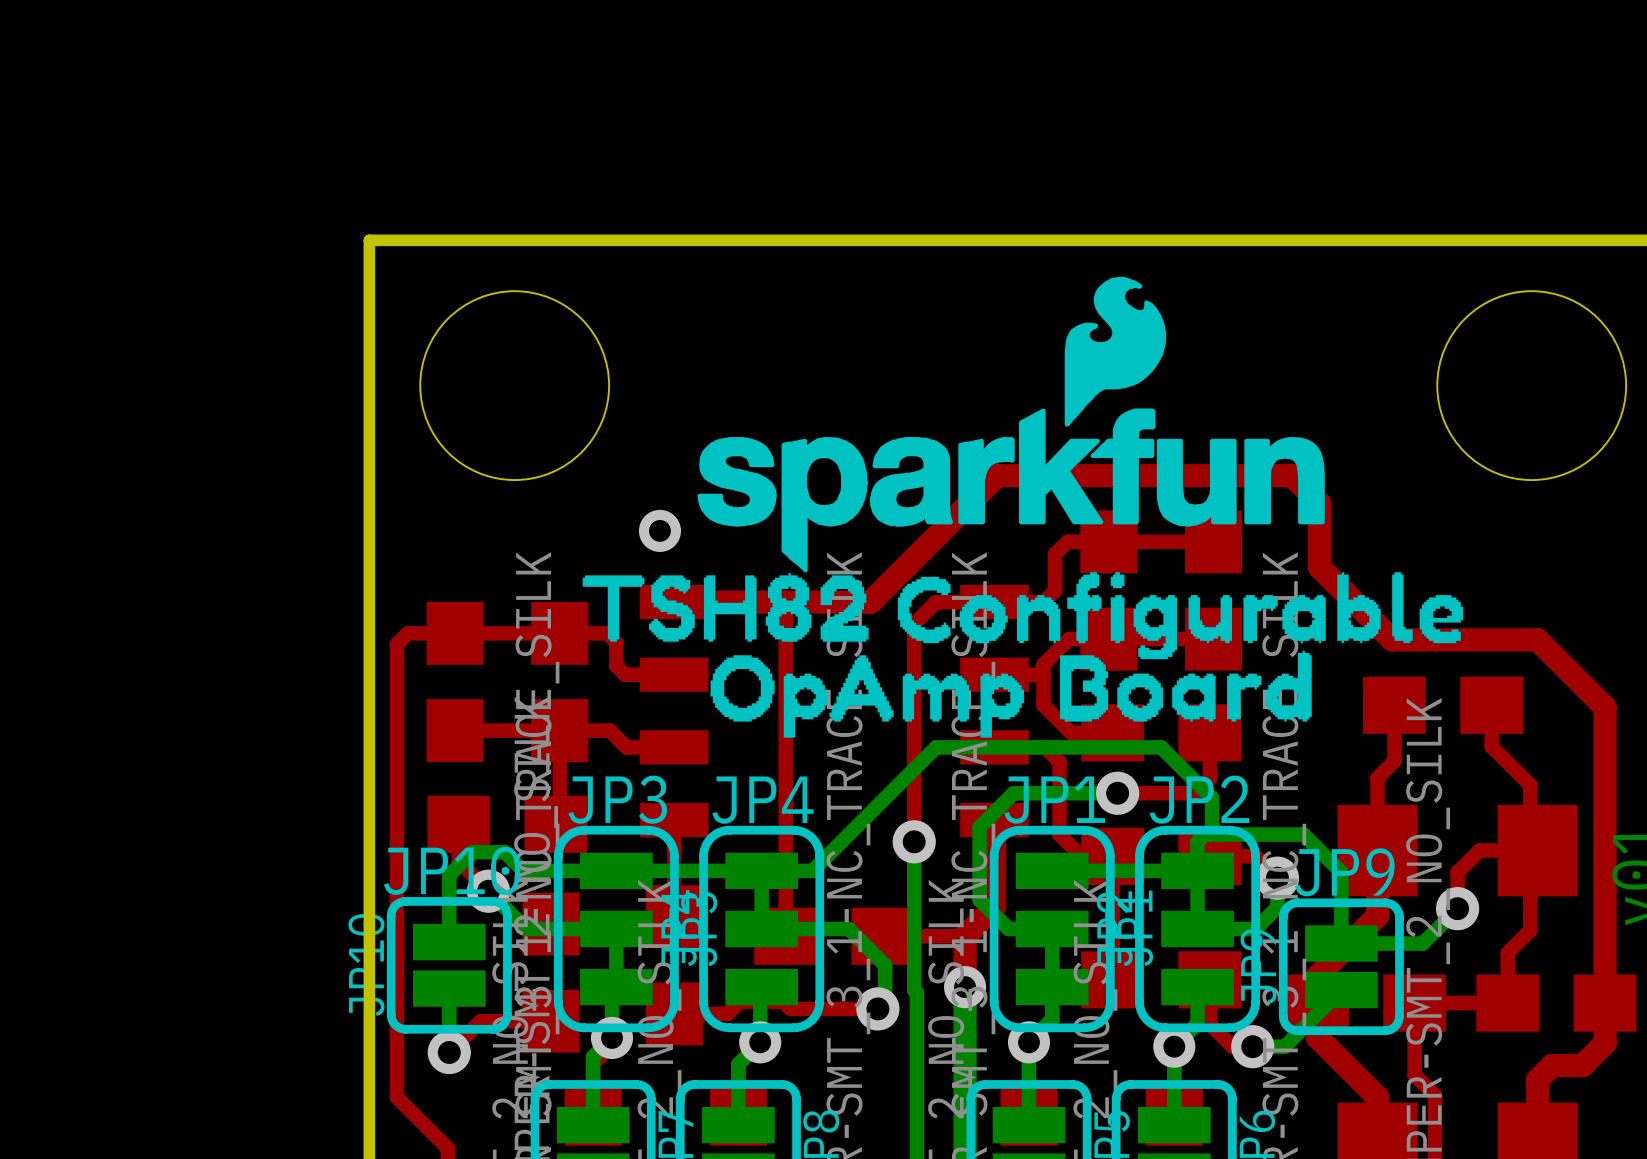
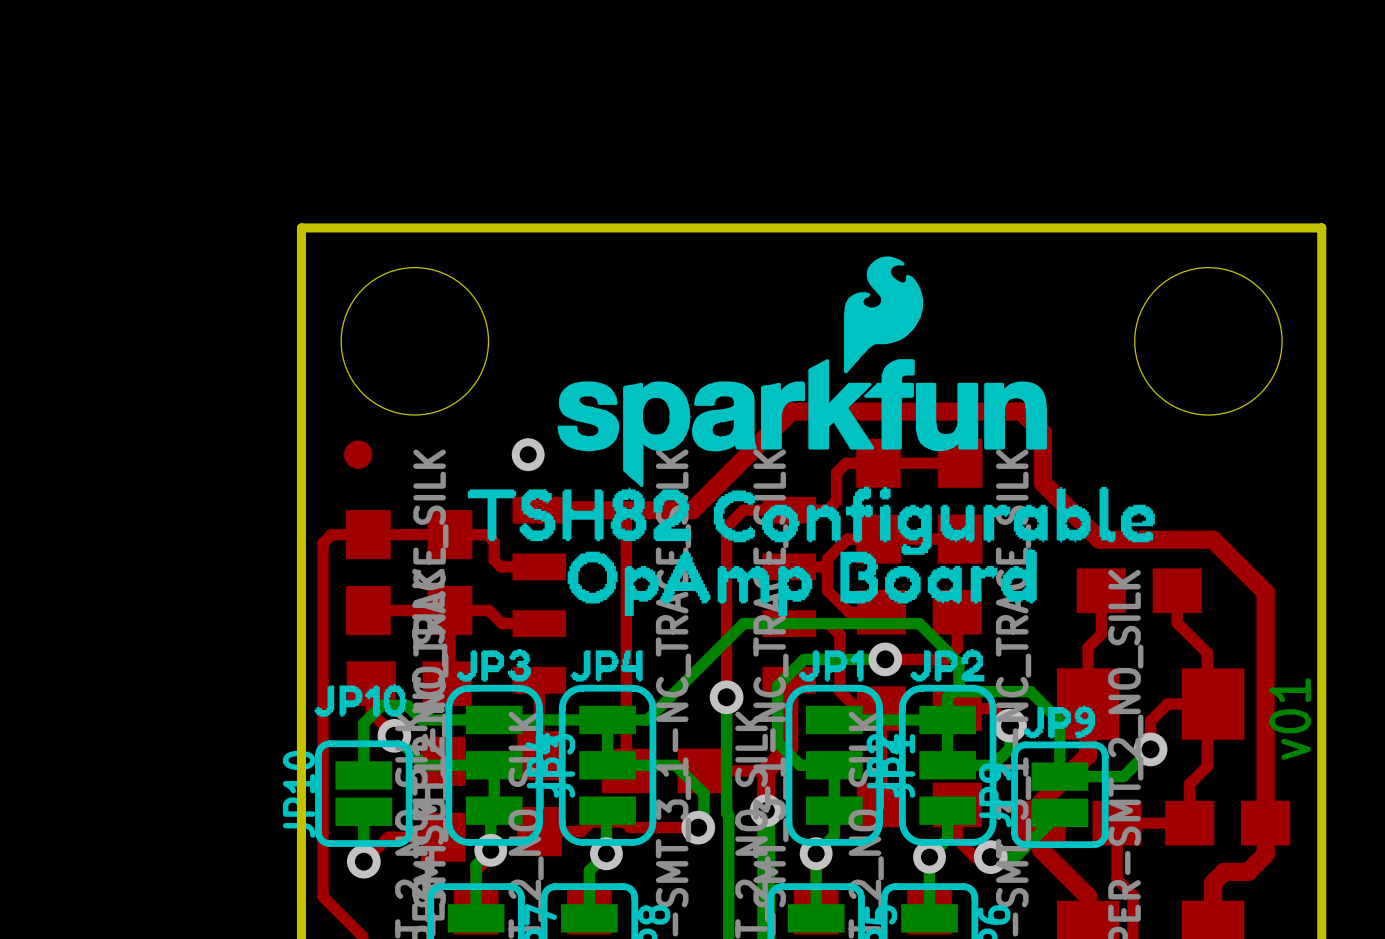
part: none -> (358, 454)
drawing: none -> [314, 648, 643, 717]
drawing: none -> [799, 648, 1095, 739]
text: JP3 (617, 799) -> none
text: JP2 (1199, 799) -> none
text: JP4 (762, 800) -> none
text: JP1 (1054, 800) -> none
text: JP10 (452, 870) -> none
text: JP9 (1344, 872) -> none

